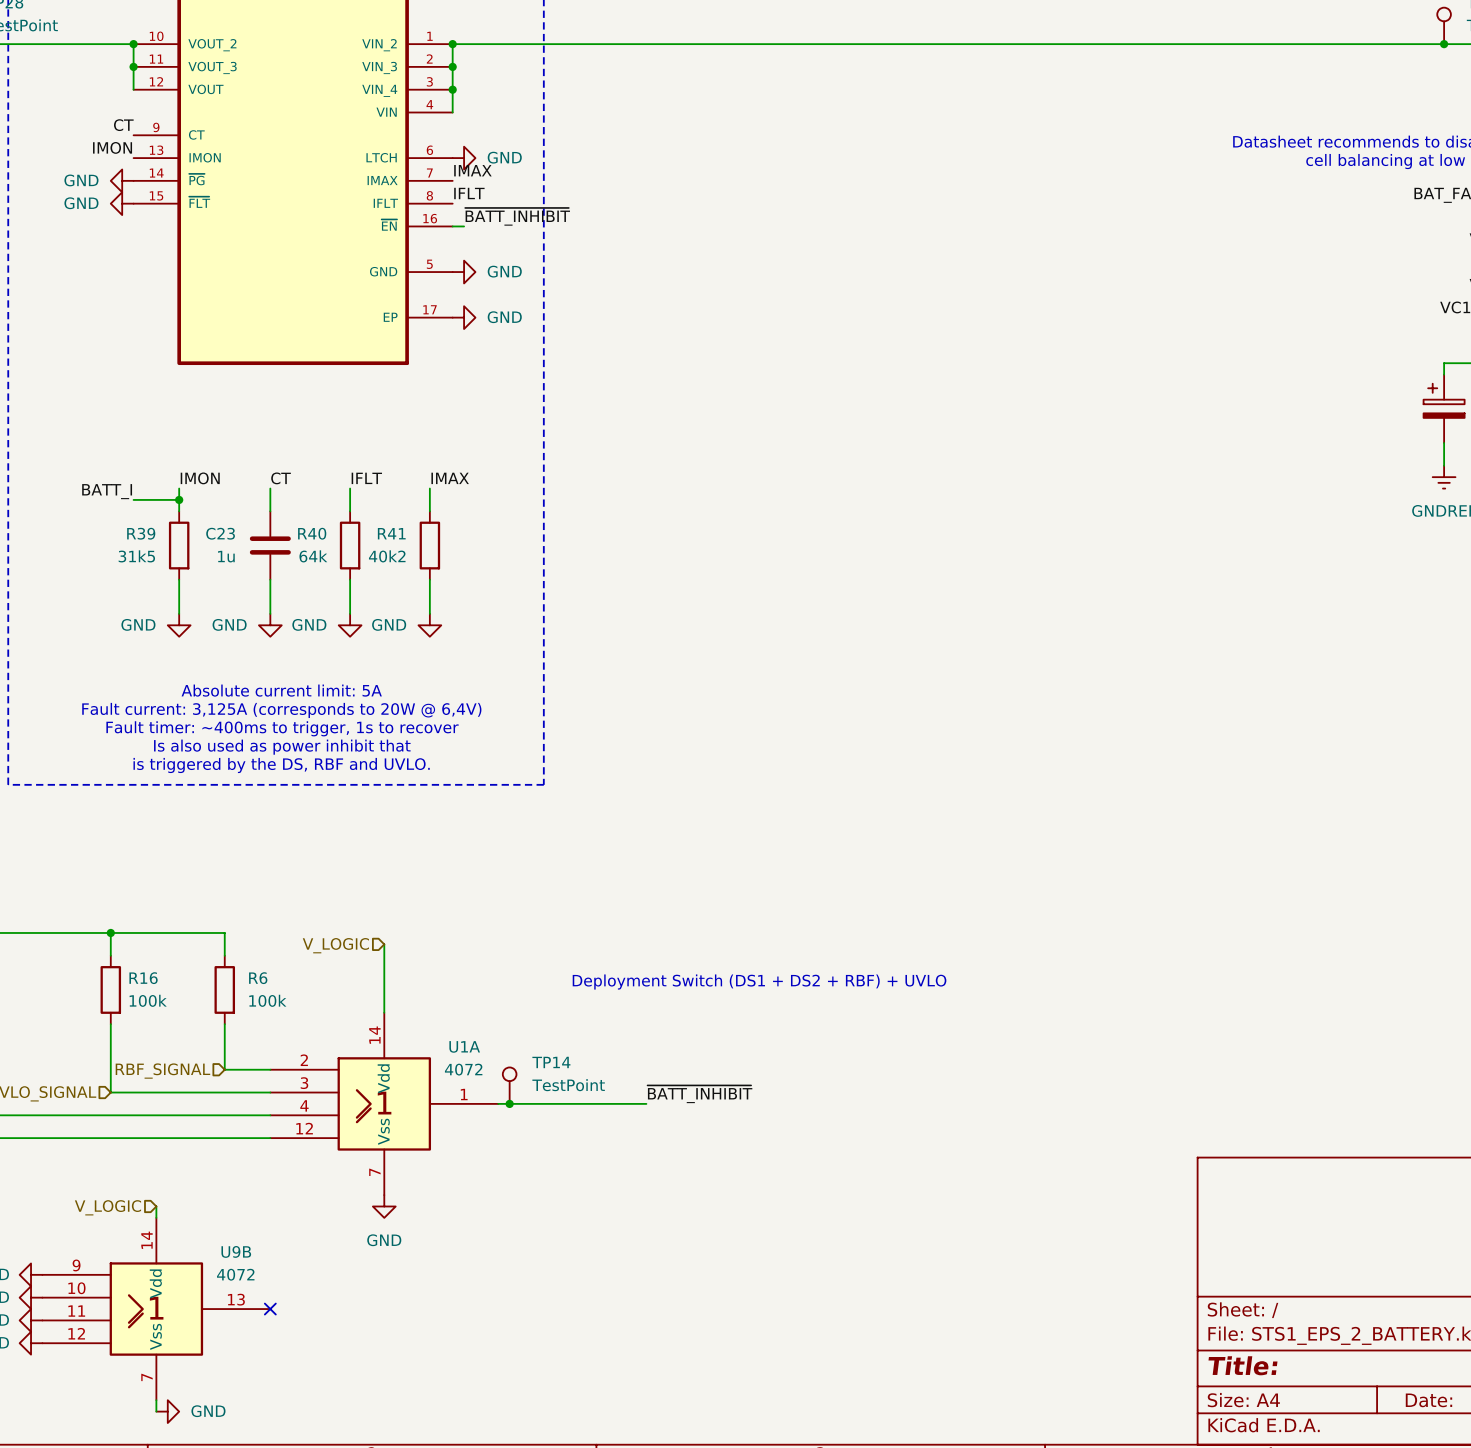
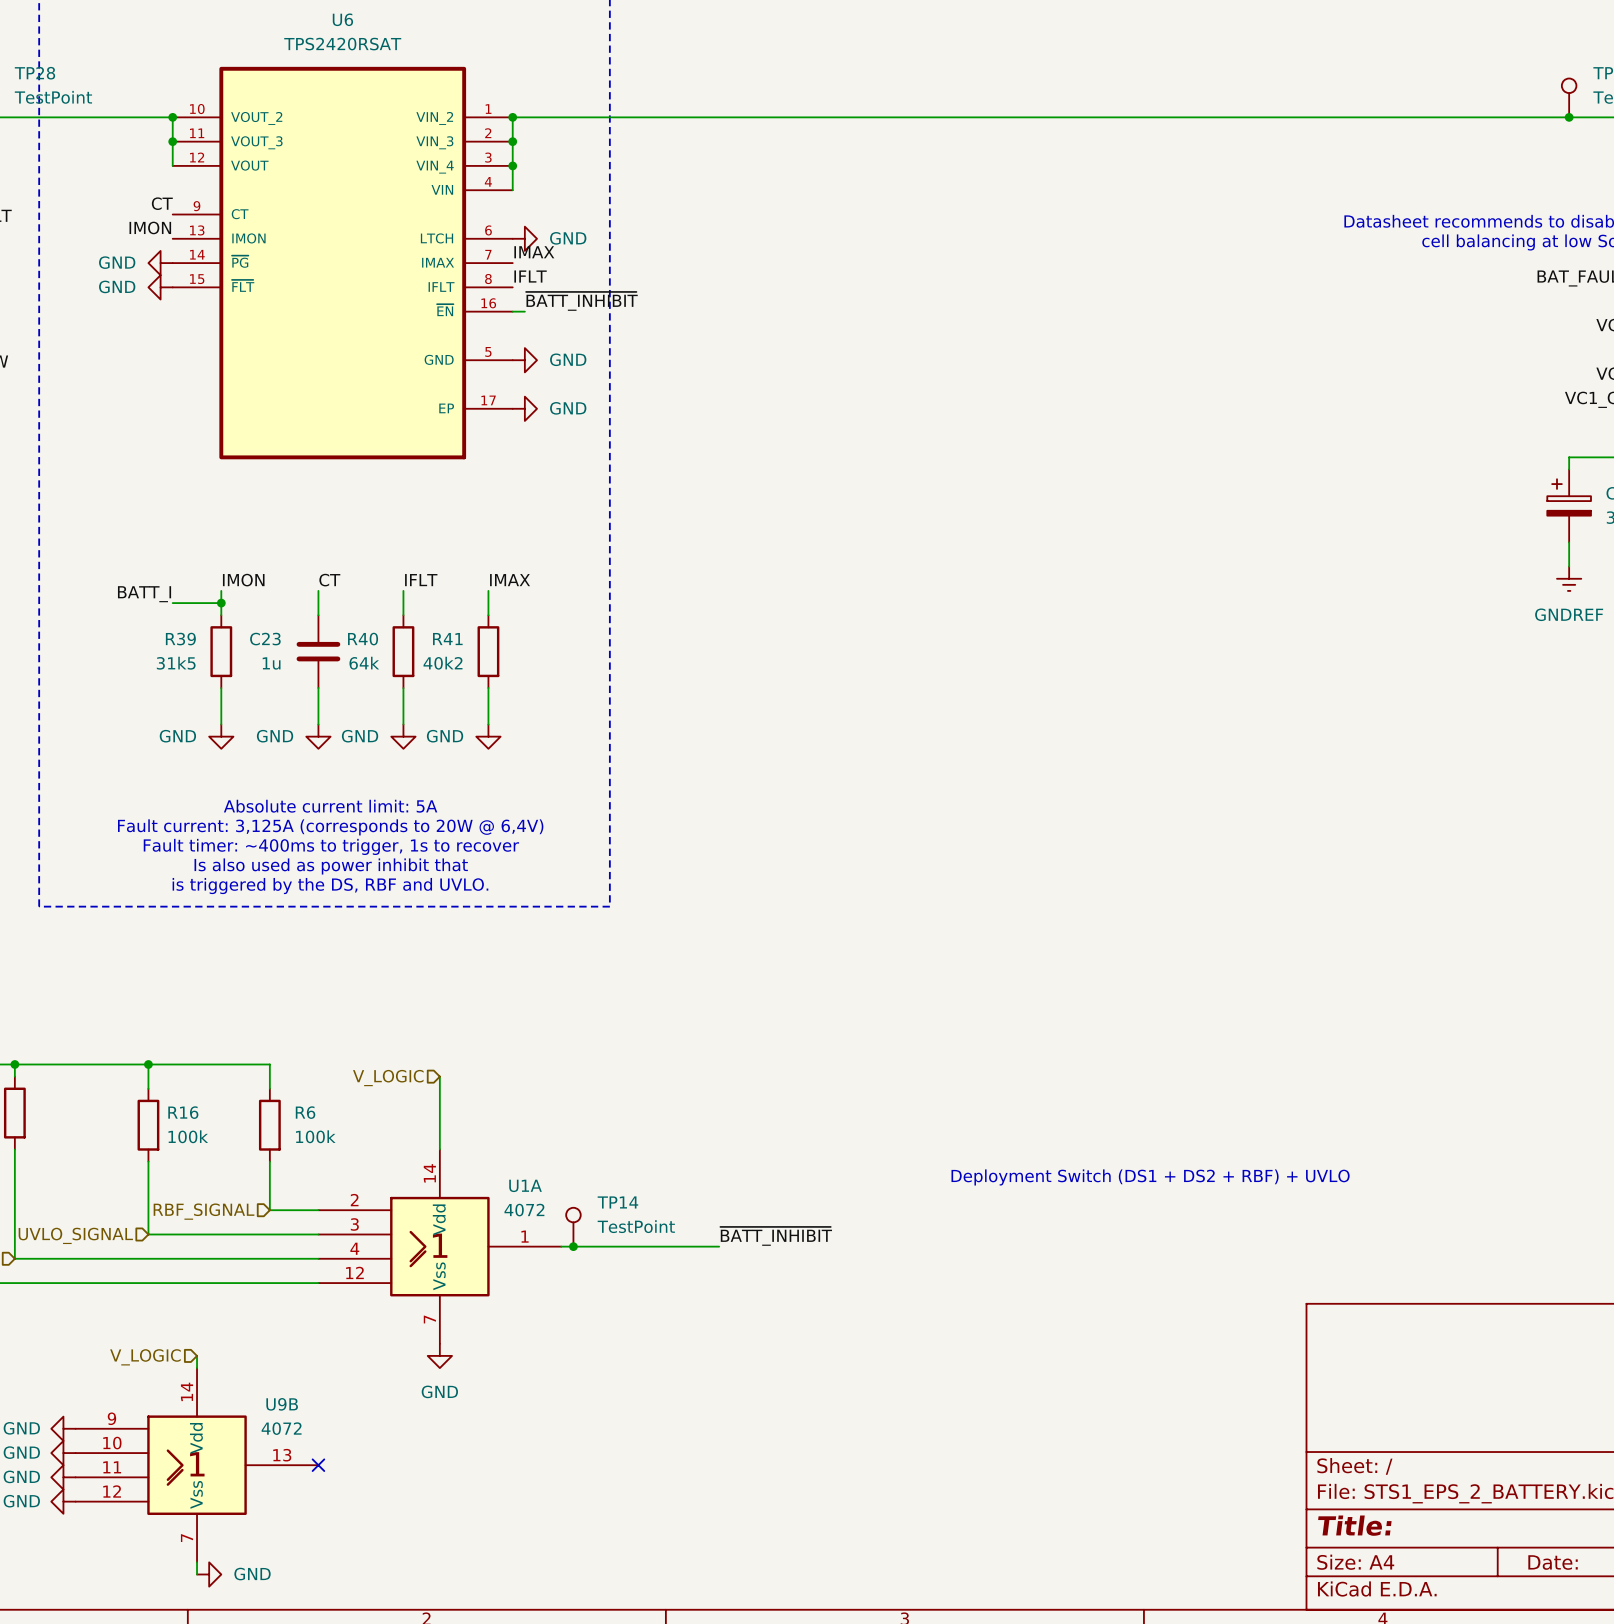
text: Deployment Switch (DS1 + DS2 + RBF) + UVLO (759, 982) -> none
text: none -> Deployment Switch (DS1 + DS2 + RBF) + UVLO (1150, 1177)

